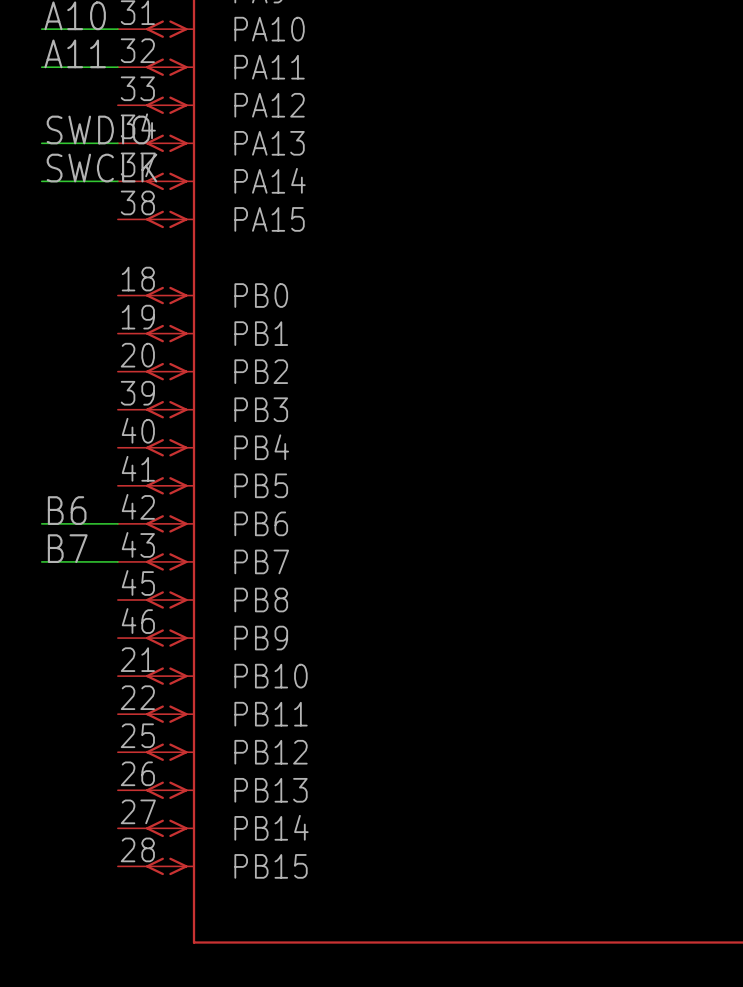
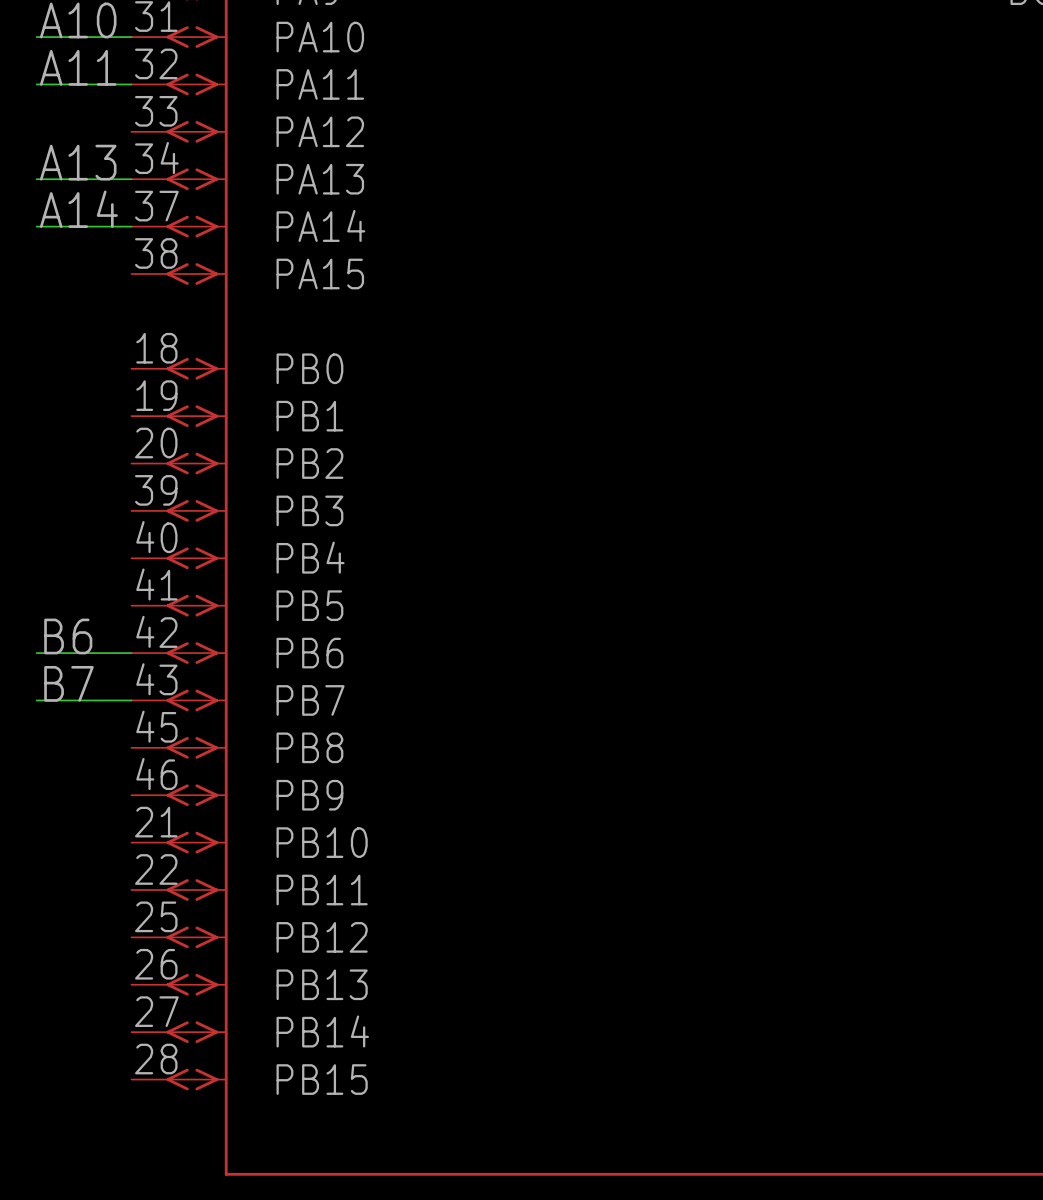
label: SWDIO (98, 129) -> A13 (78, 162)
label: SWCLK (101, 168) -> A14 (78, 209)

